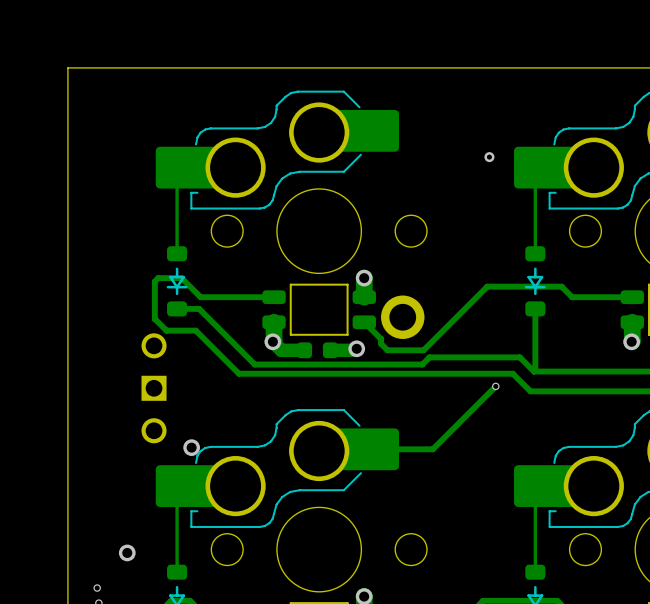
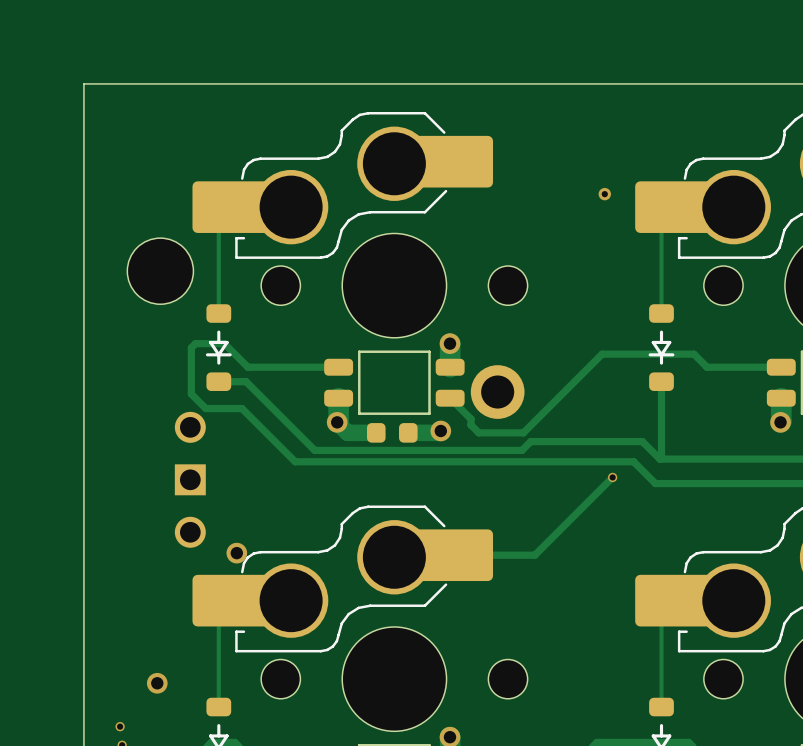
part: none -> (160, 271)

